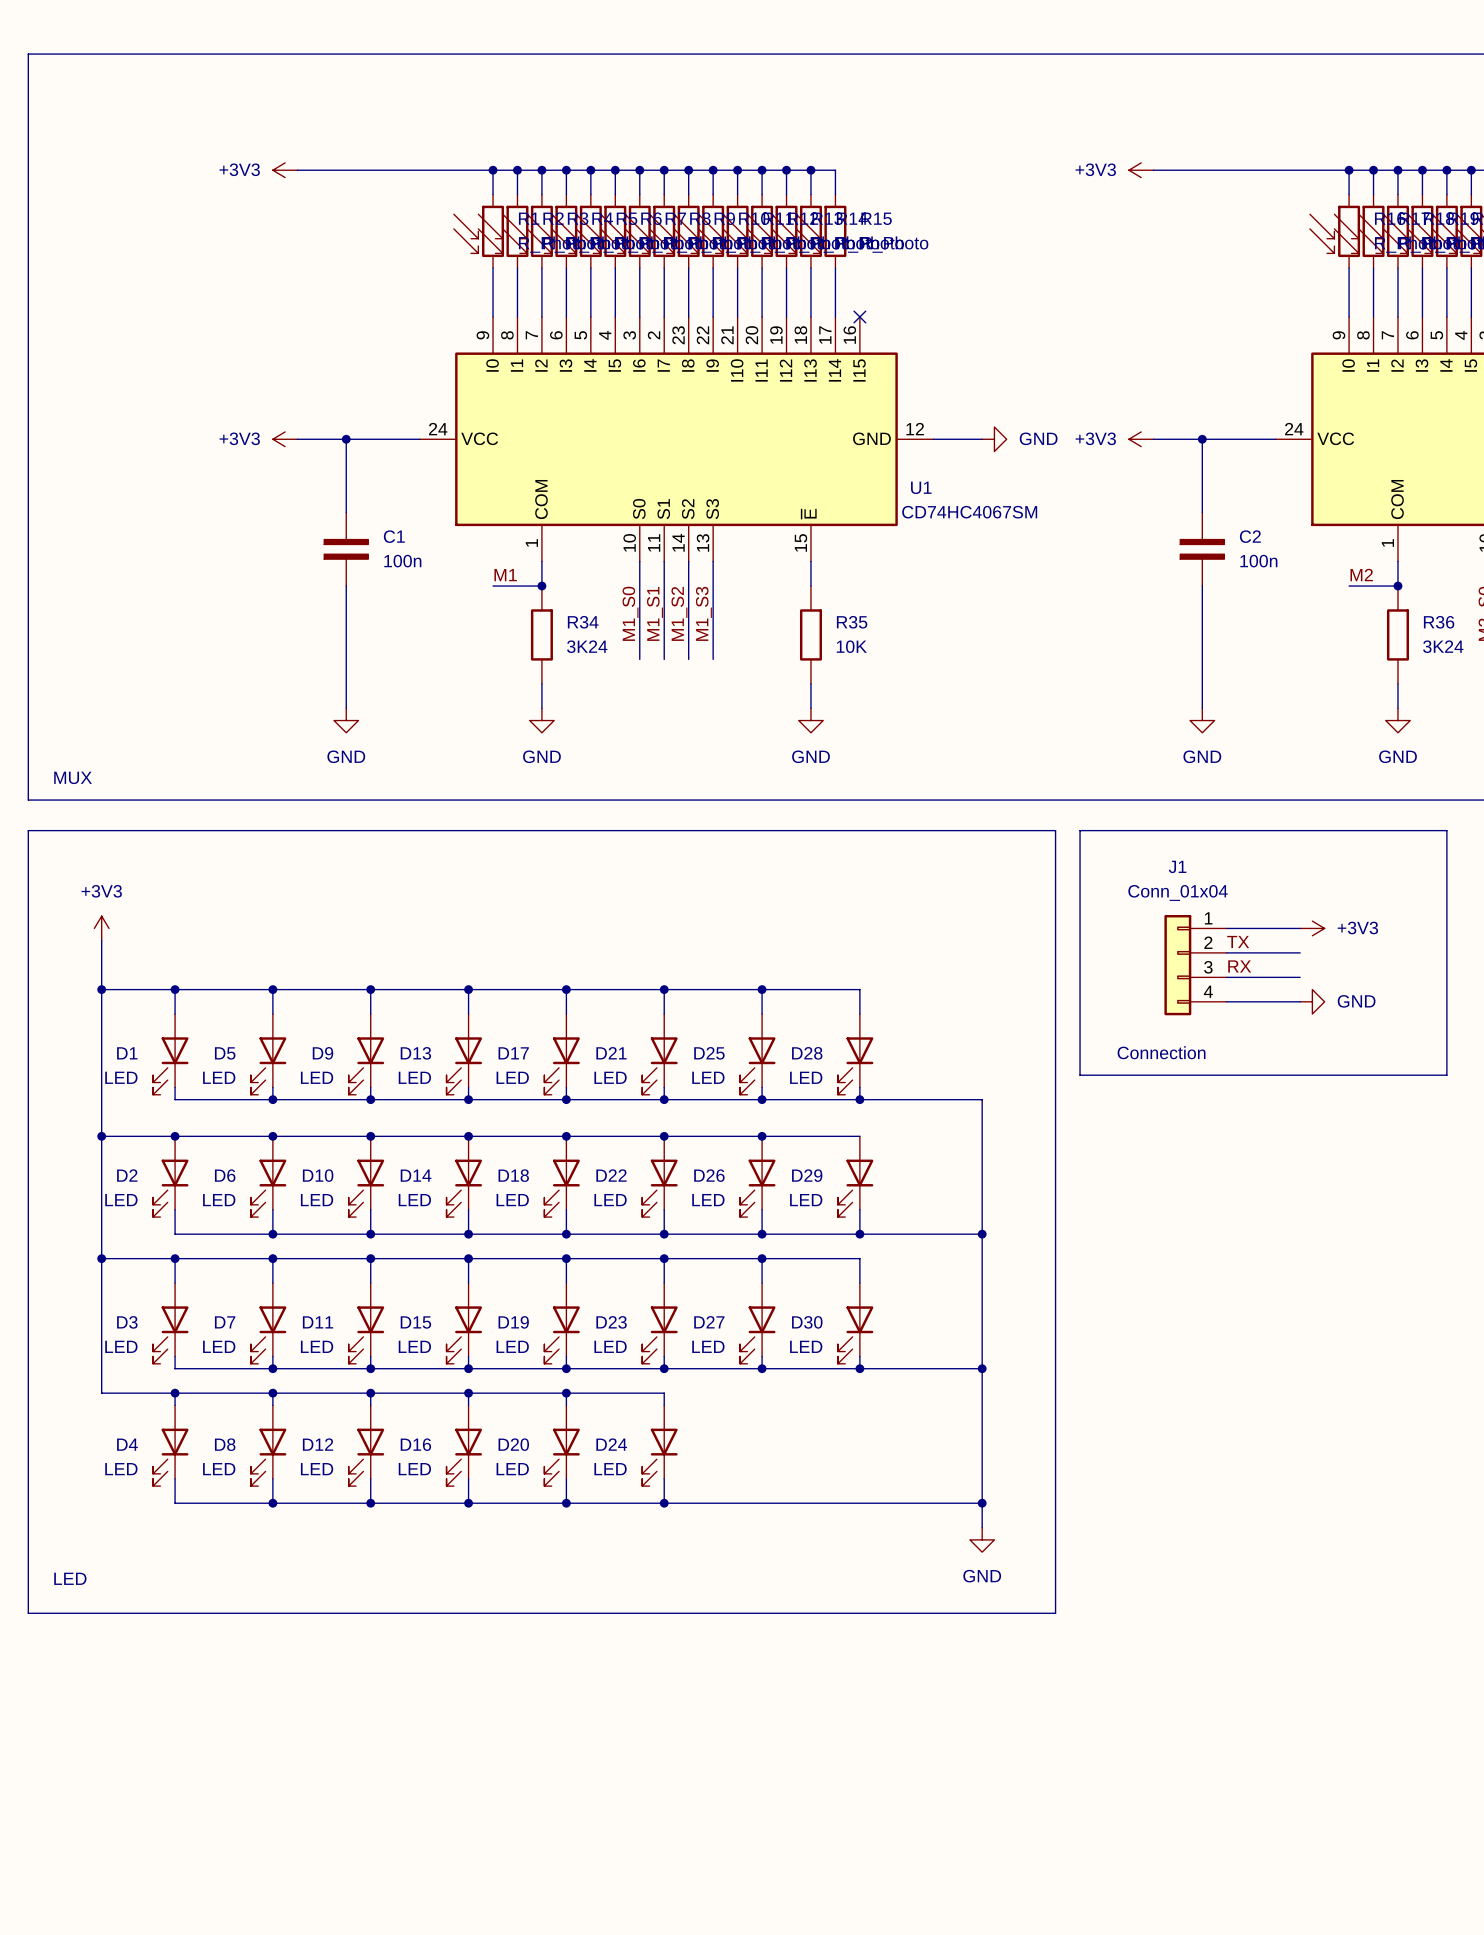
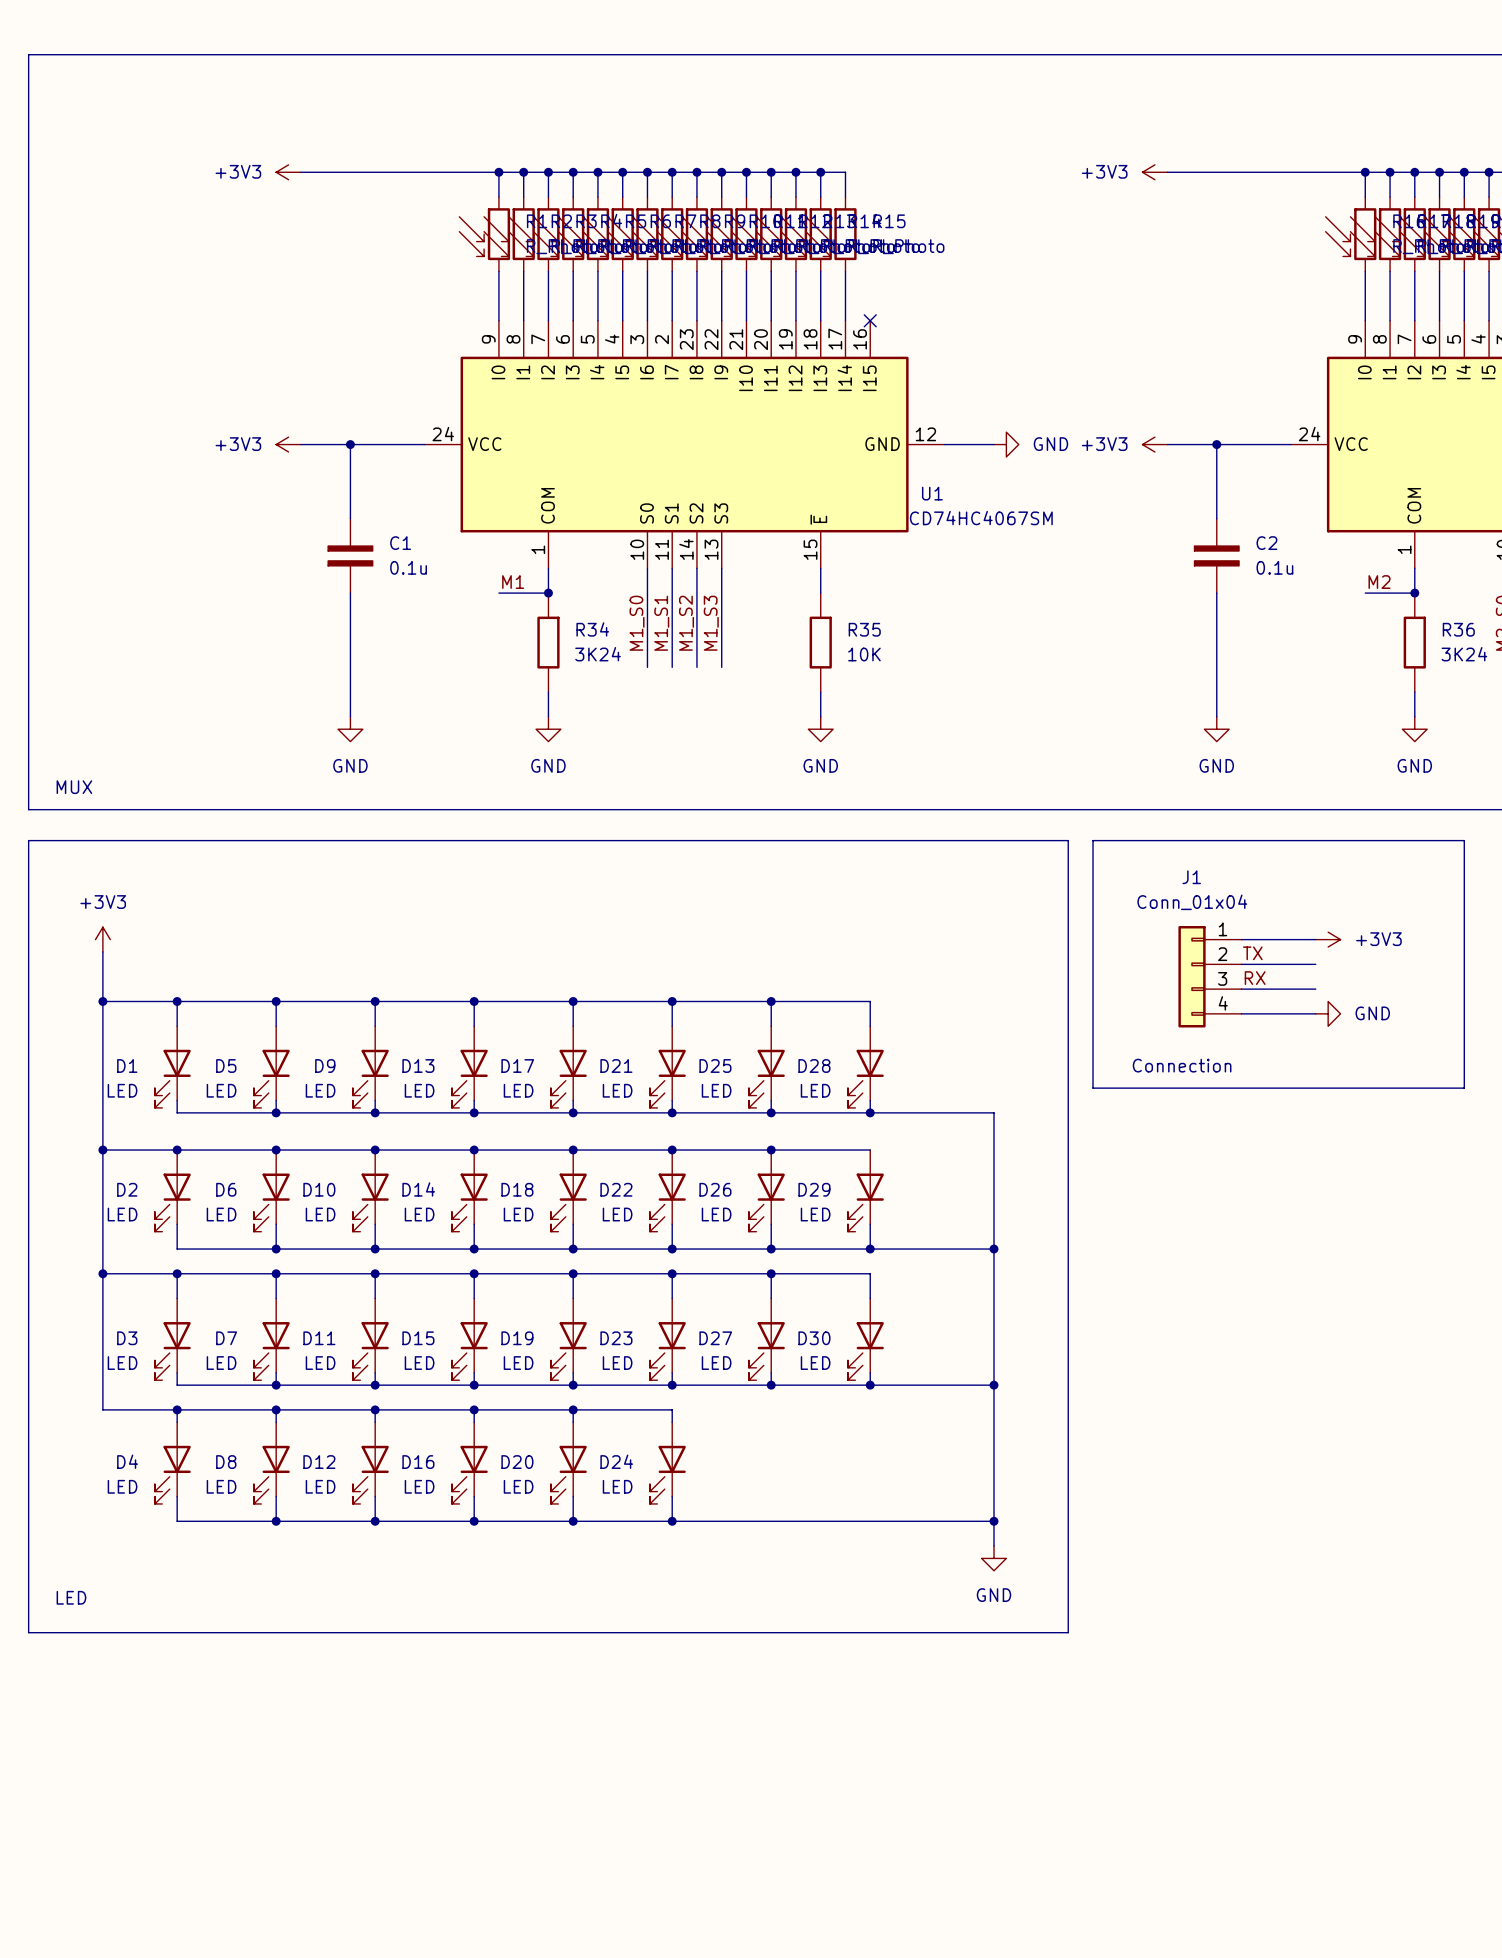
C1 value: 100n (402, 561) -> 0.1u (408, 567)
C2 value: 100n (1258, 561) -> 0.1u (1274, 567)

